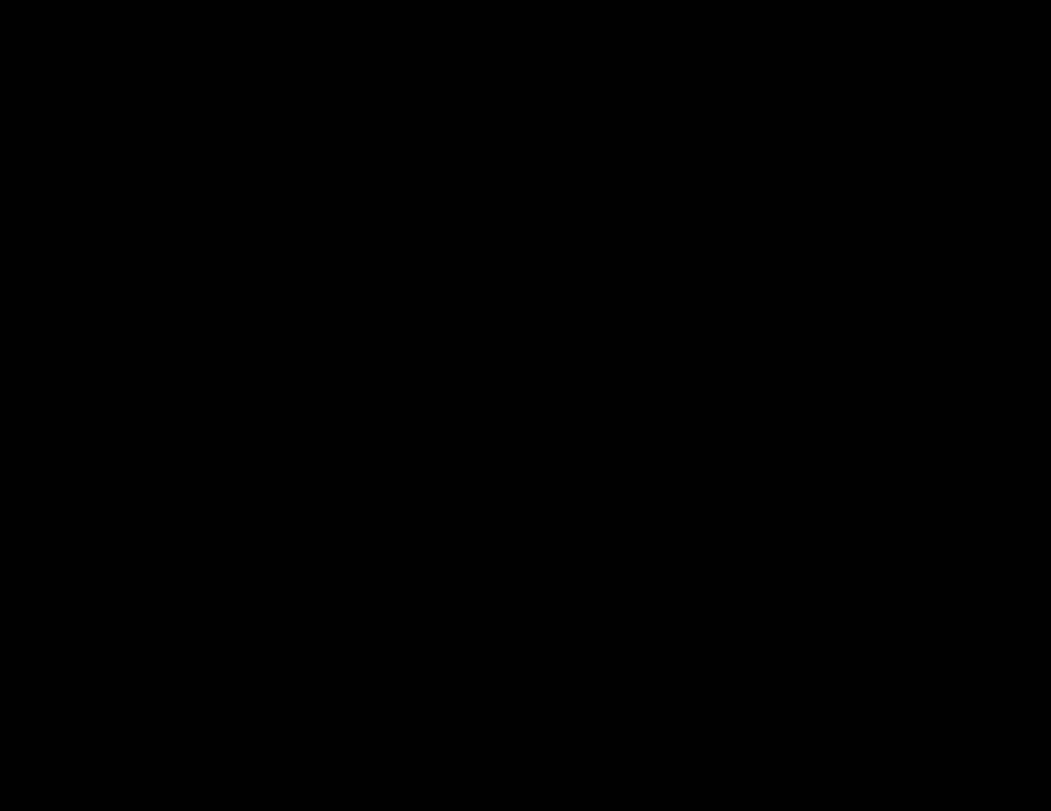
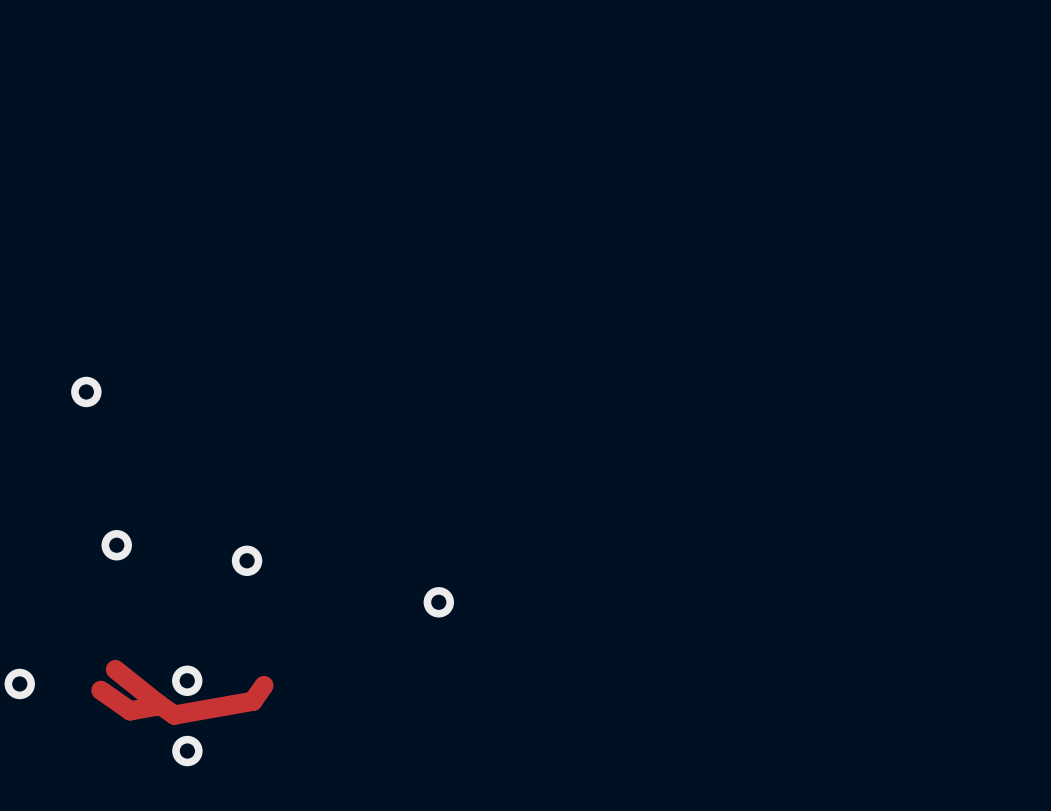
via: none -> (86, 391)
via: none -> (116, 545)
via: none -> (247, 560)
via: none -> (438, 602)
top track: none -> (115, 669) (158, 704)
via: none -> (187, 680)
via: none -> (19, 683)
top track: none -> (263, 685) (252, 701) (174, 715) (158, 704)
top track: none -> (100, 690) (130, 710) (157, 706) (158, 704)
via: none -> (187, 751)

